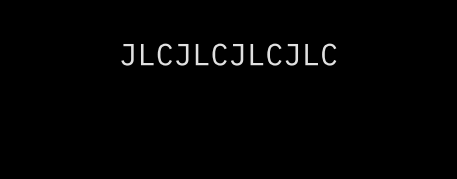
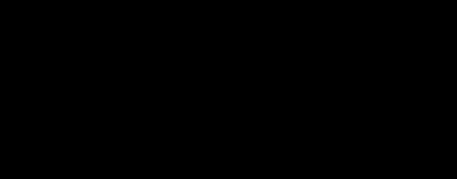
text: JLCJLCJLCJLC (228, 54) -> none

